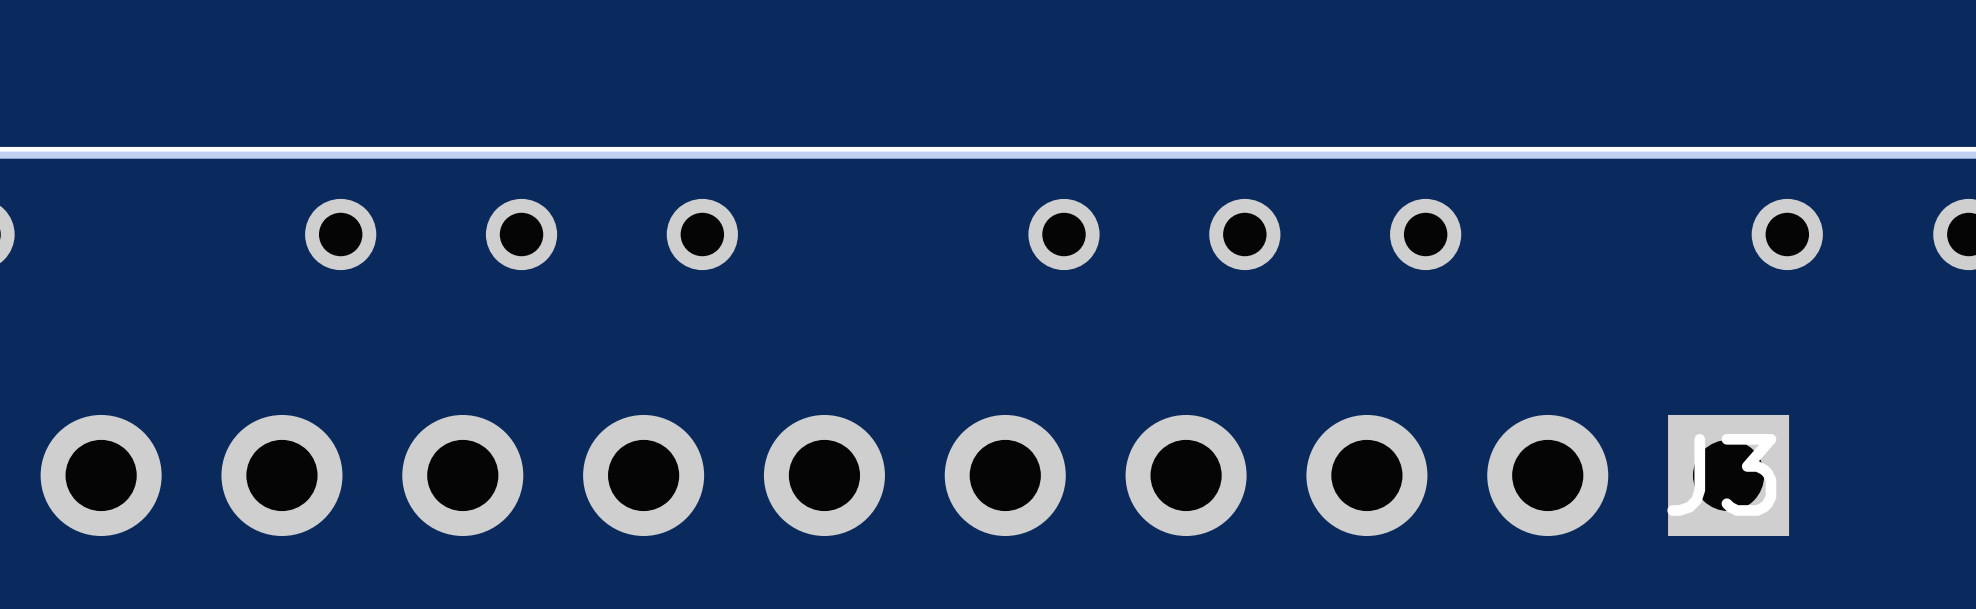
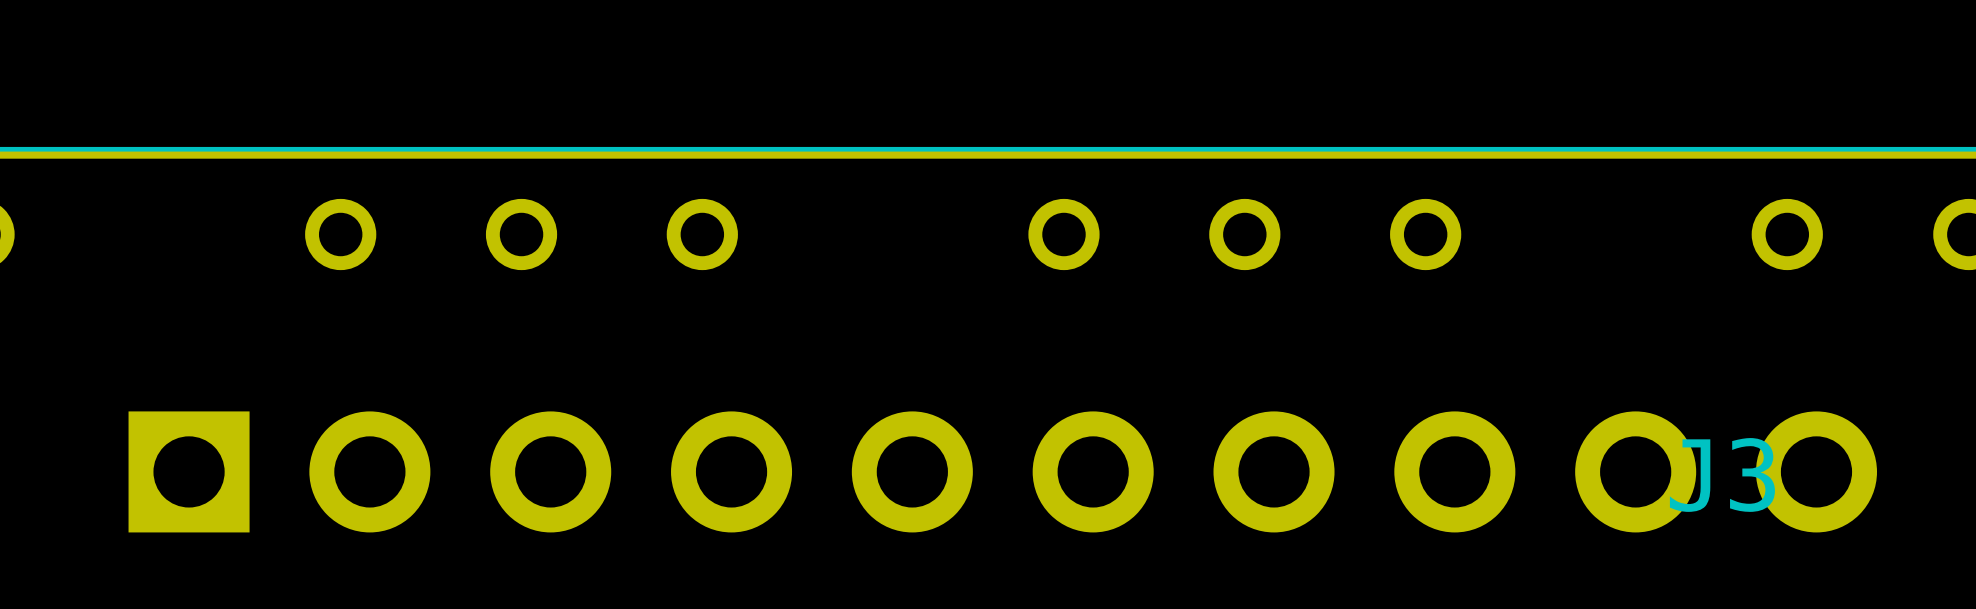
part rotation: 0° (914, 475) -> 180° (1002, 471)

